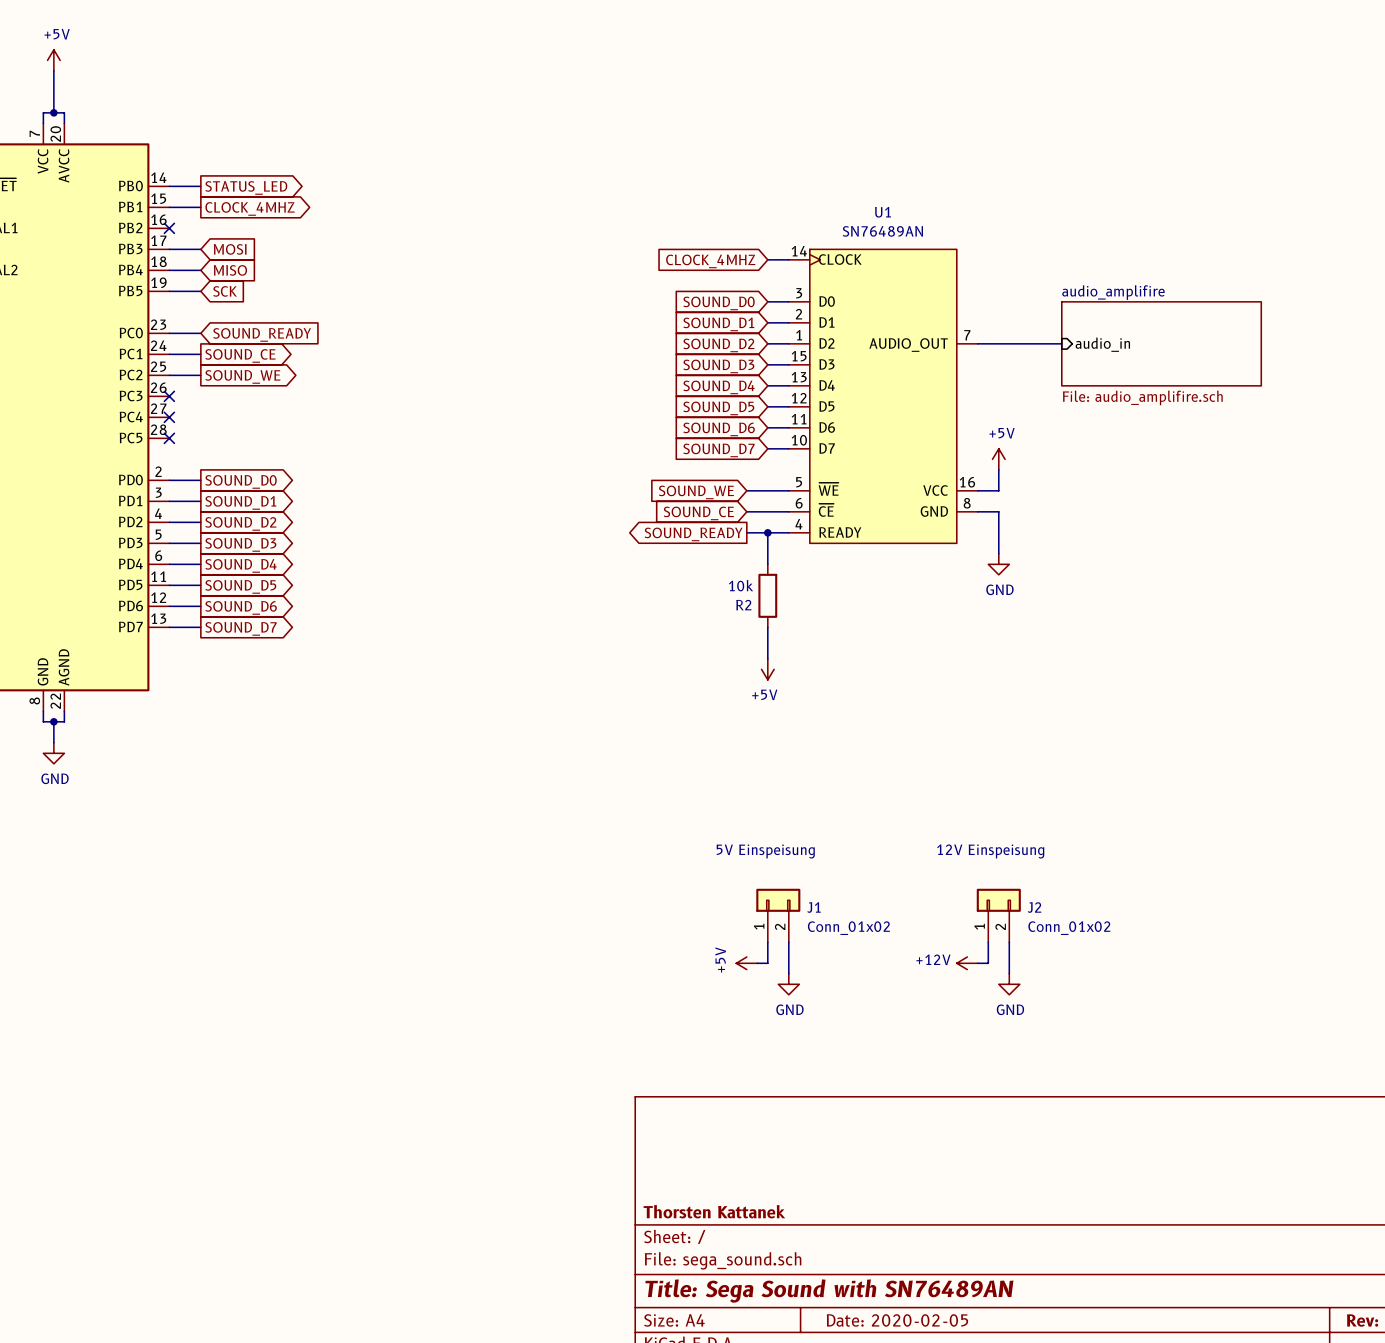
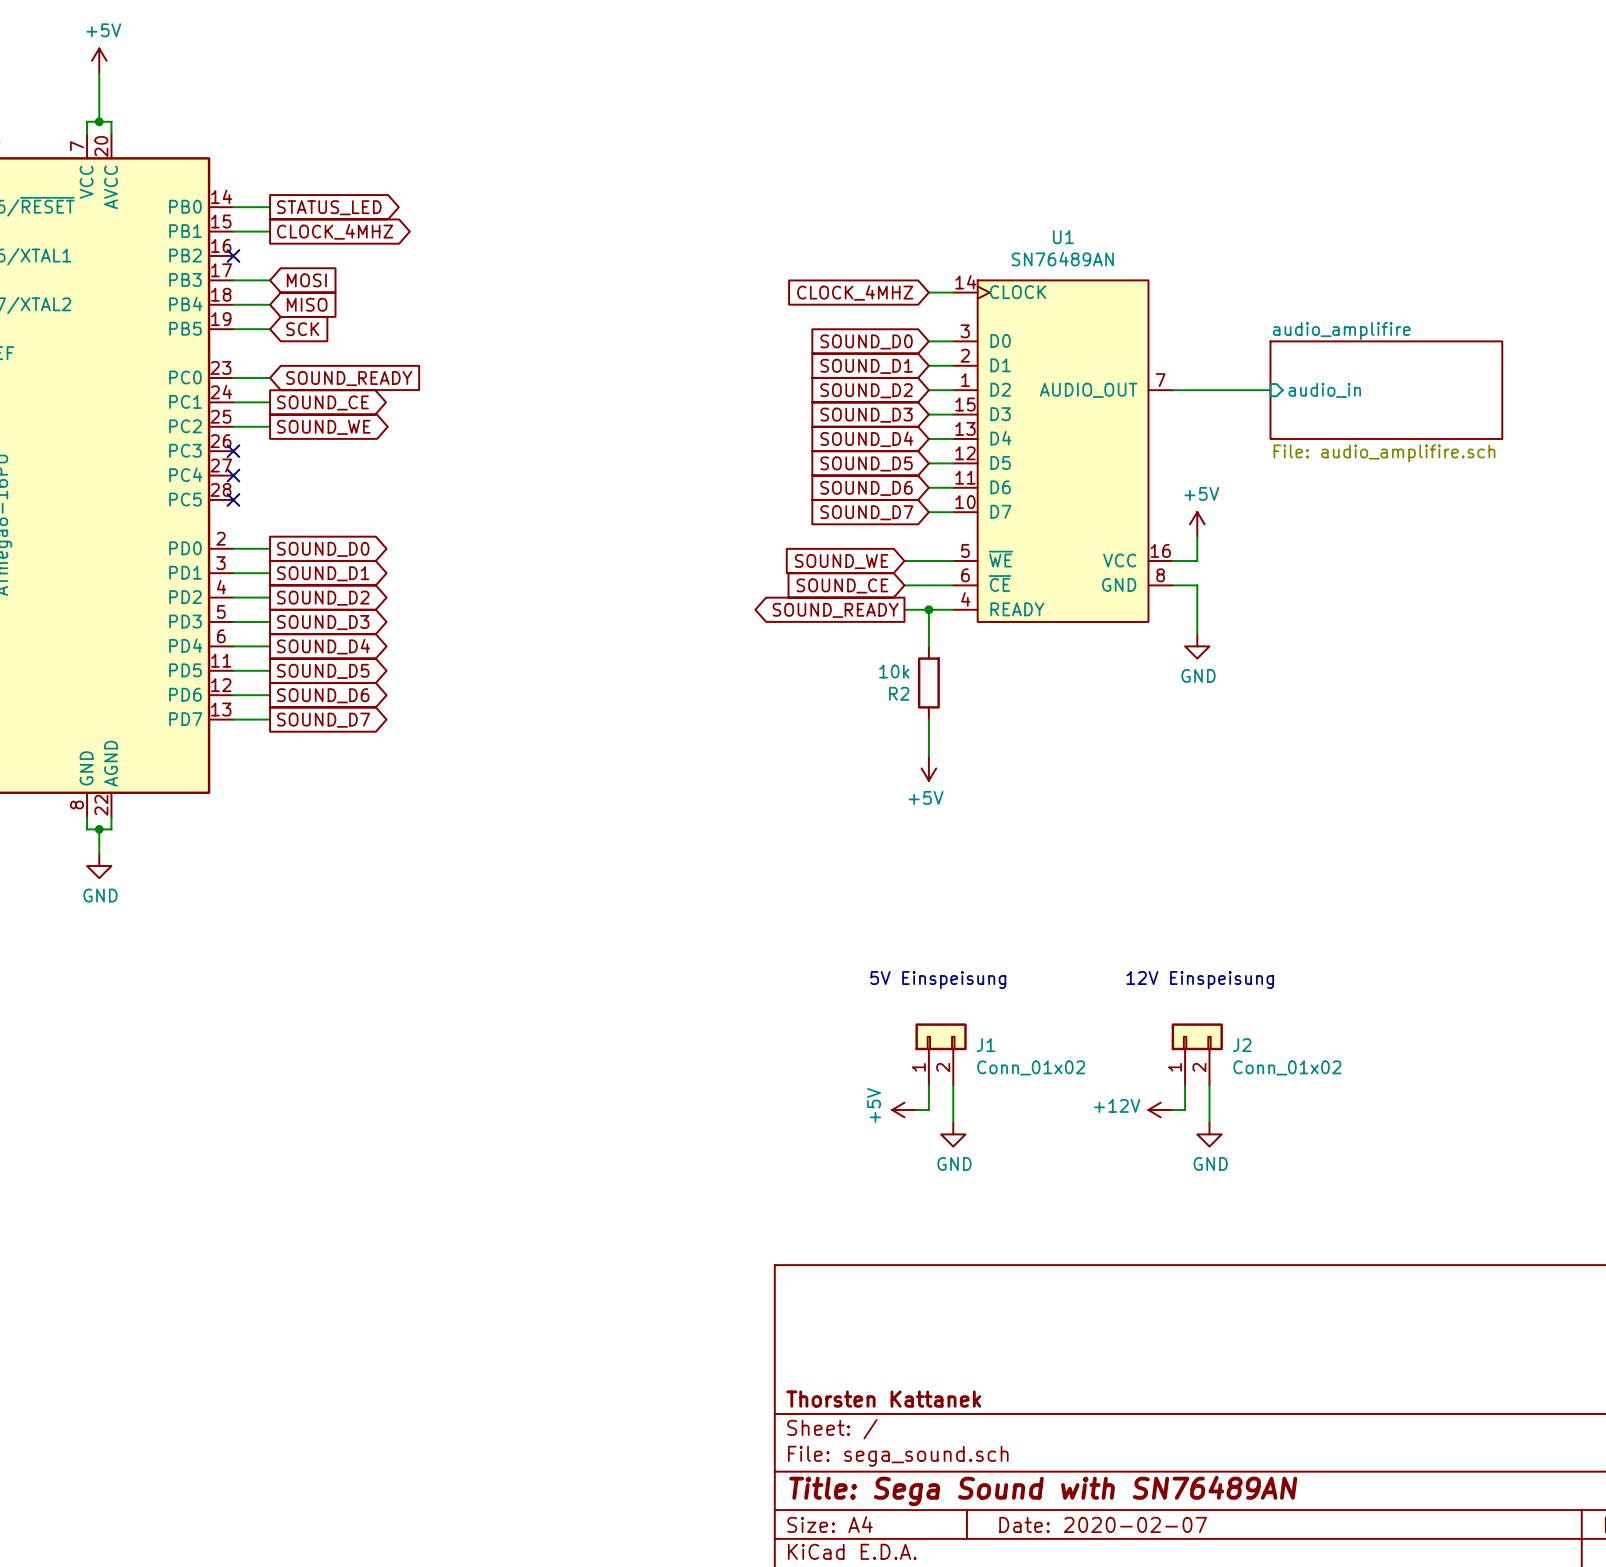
title block: Date: 2020-02-05 (897, 1320) -> Date: 2020-02-07 (1103, 1524)

